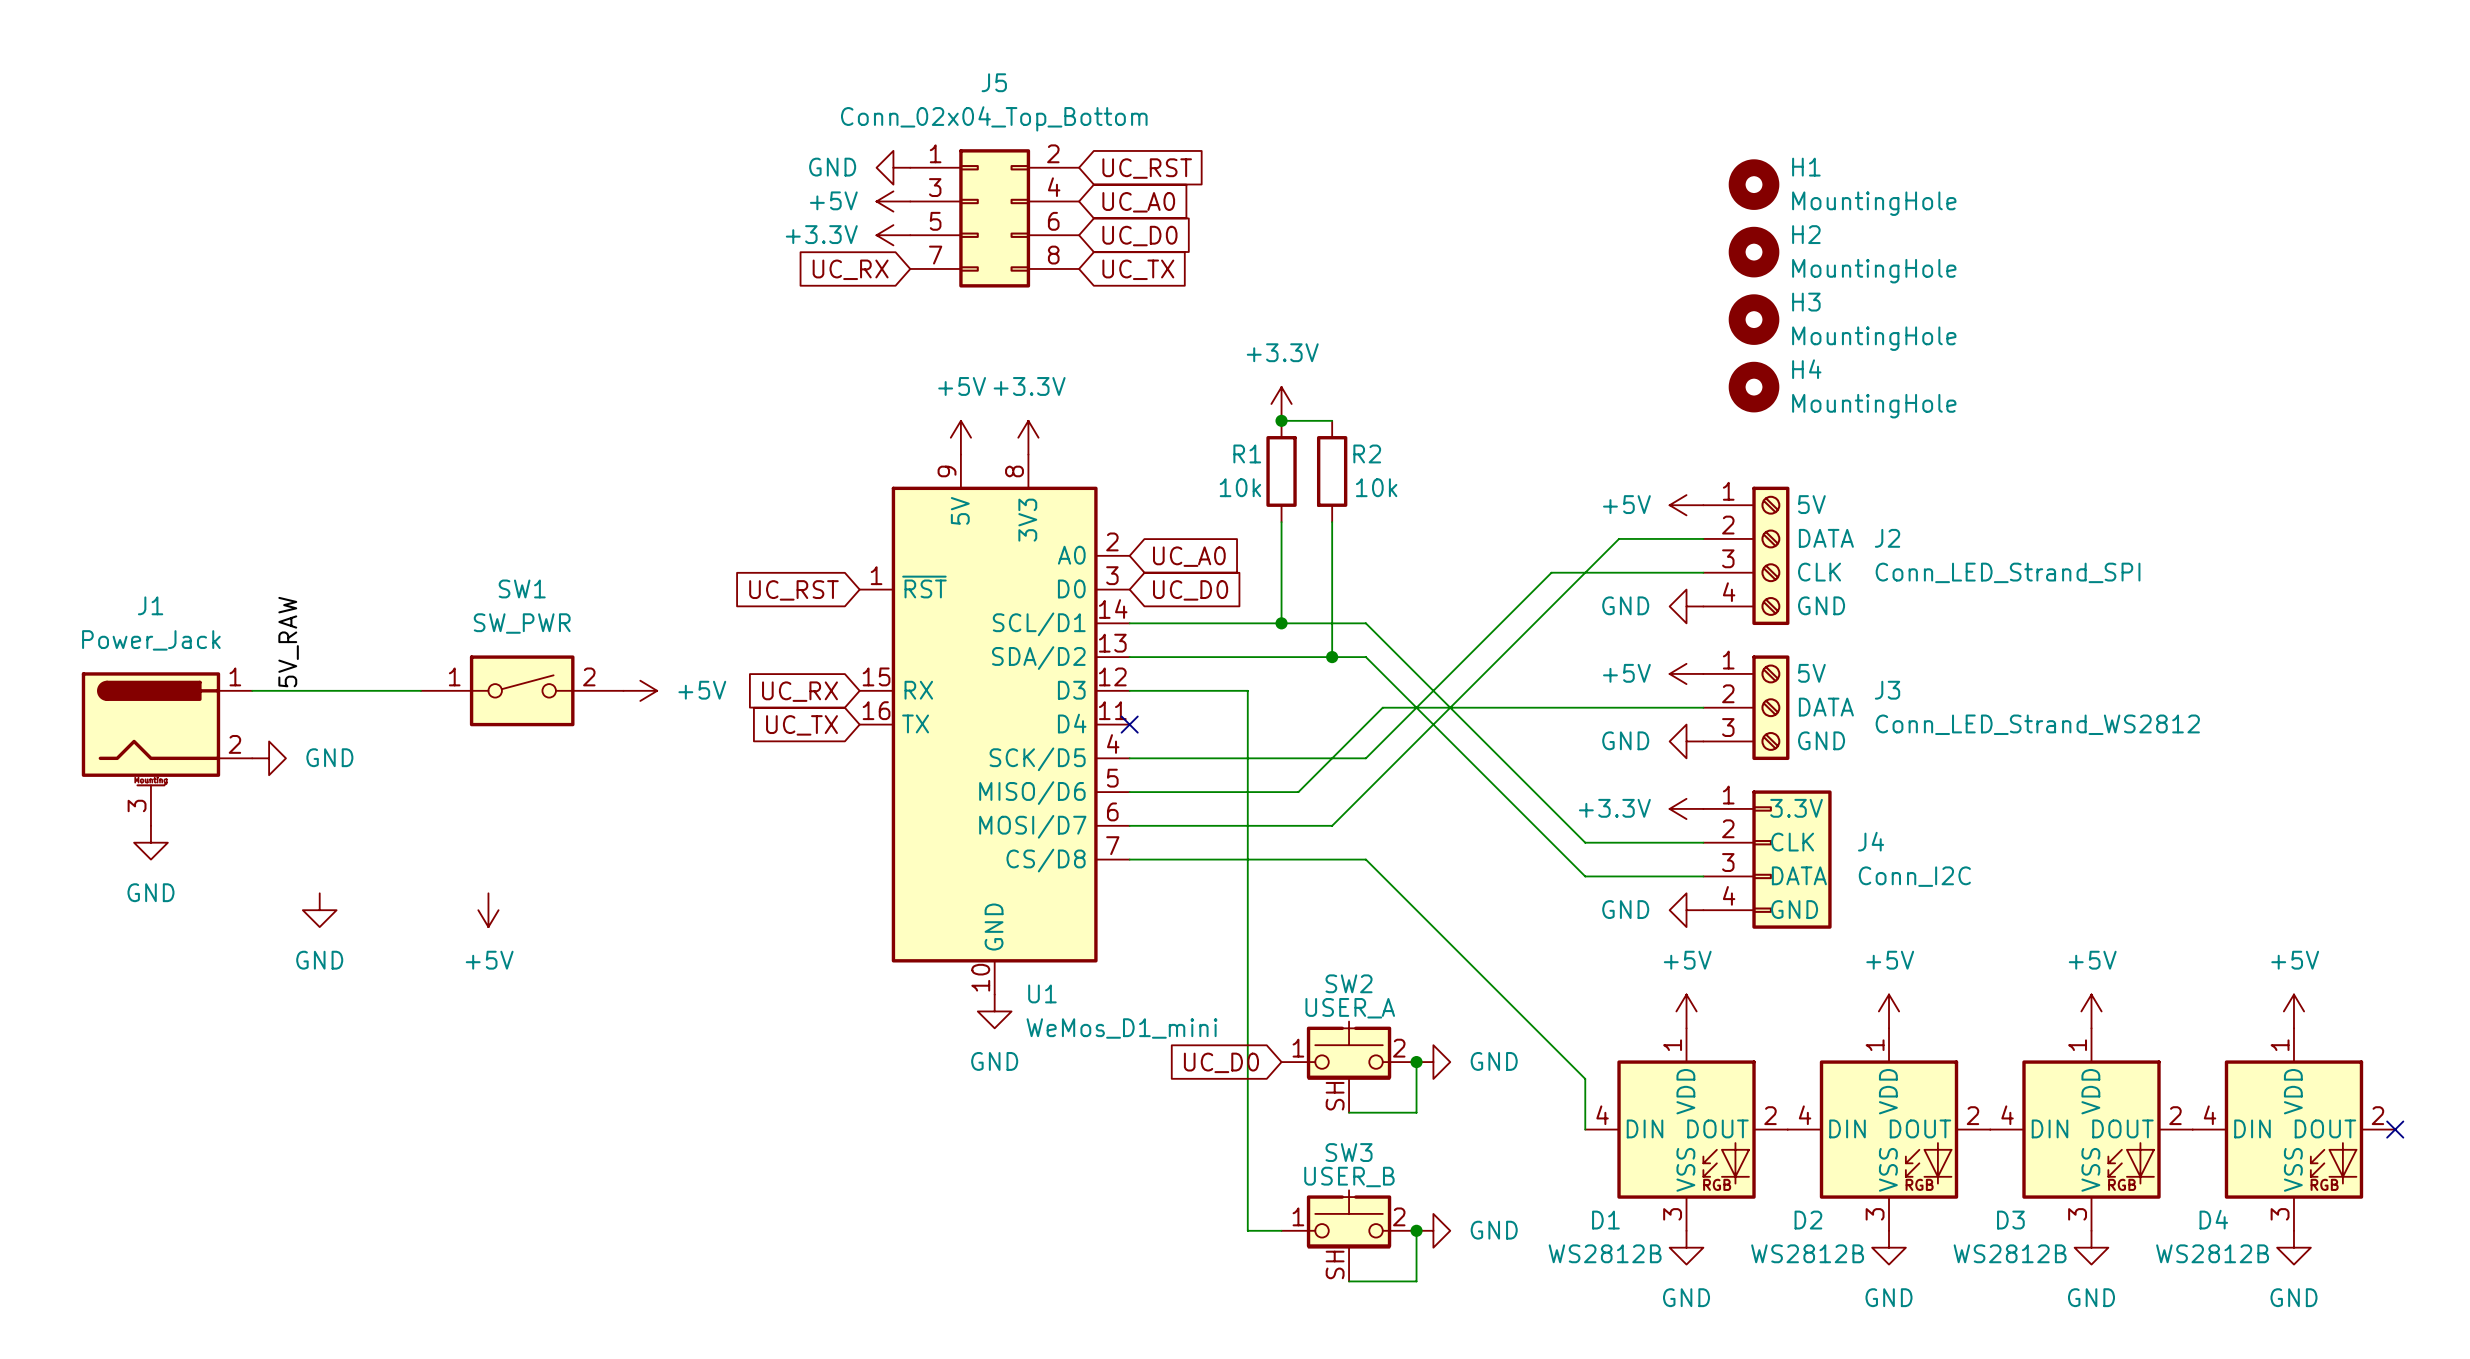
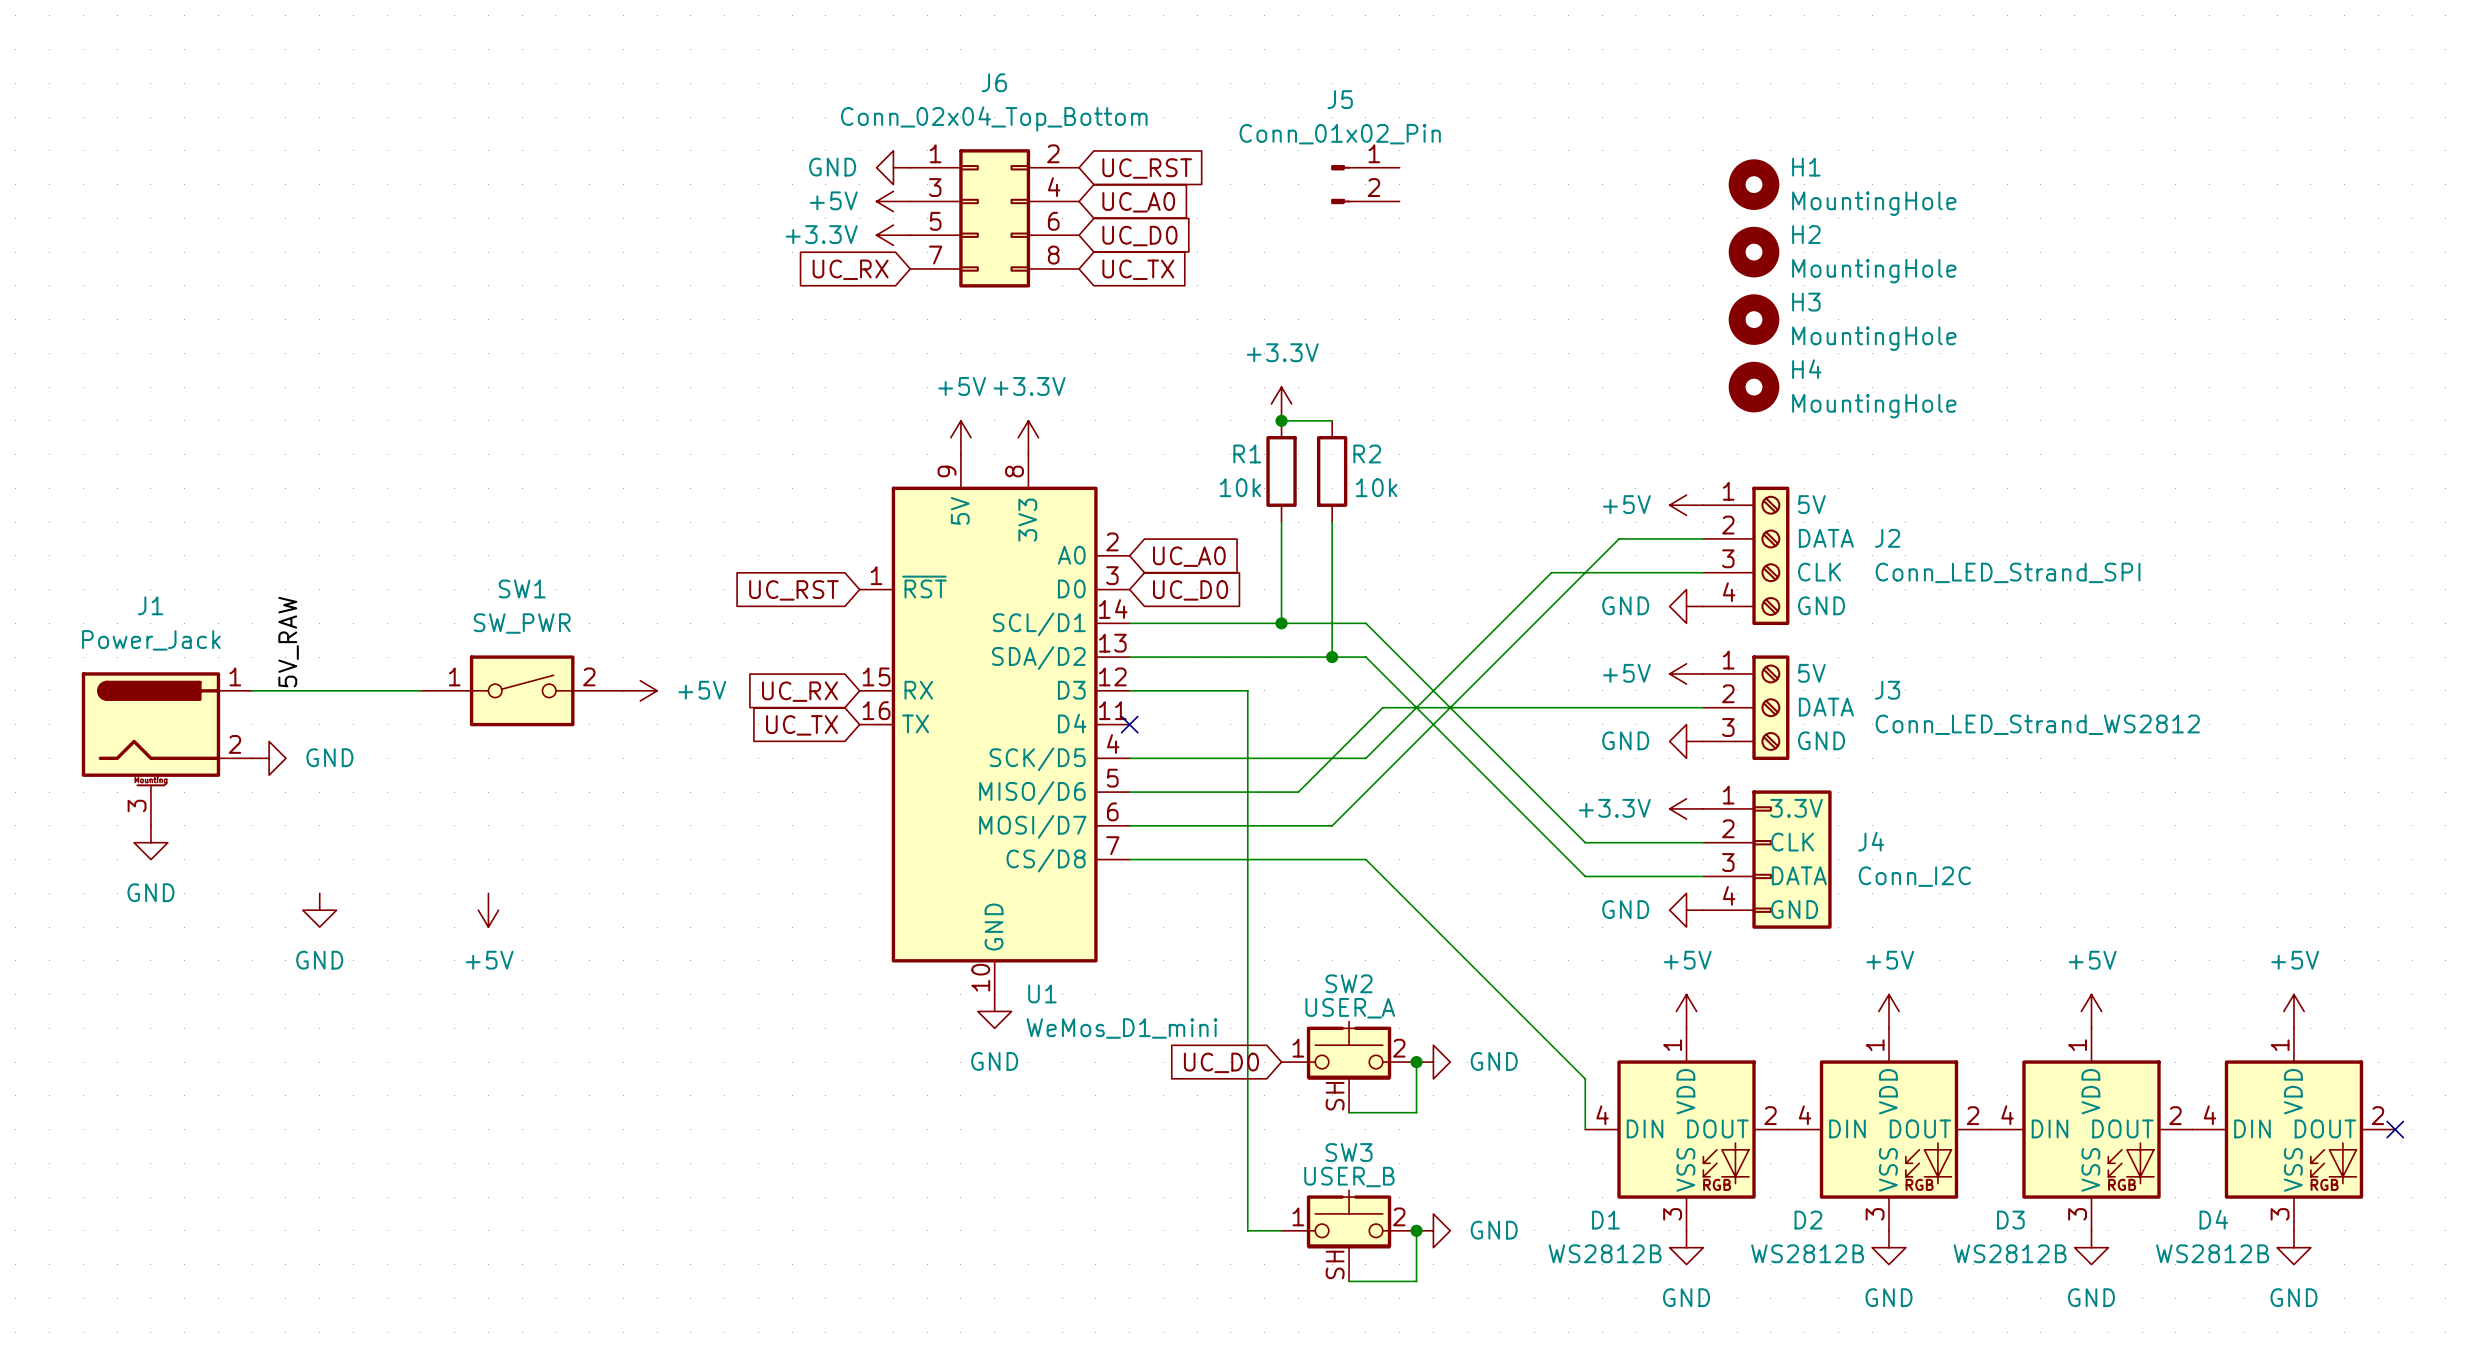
J5 name: J5 (994, 82) -> J6 (994, 82)
J5: none -> Conn_01x02_Pin (1365, 184)

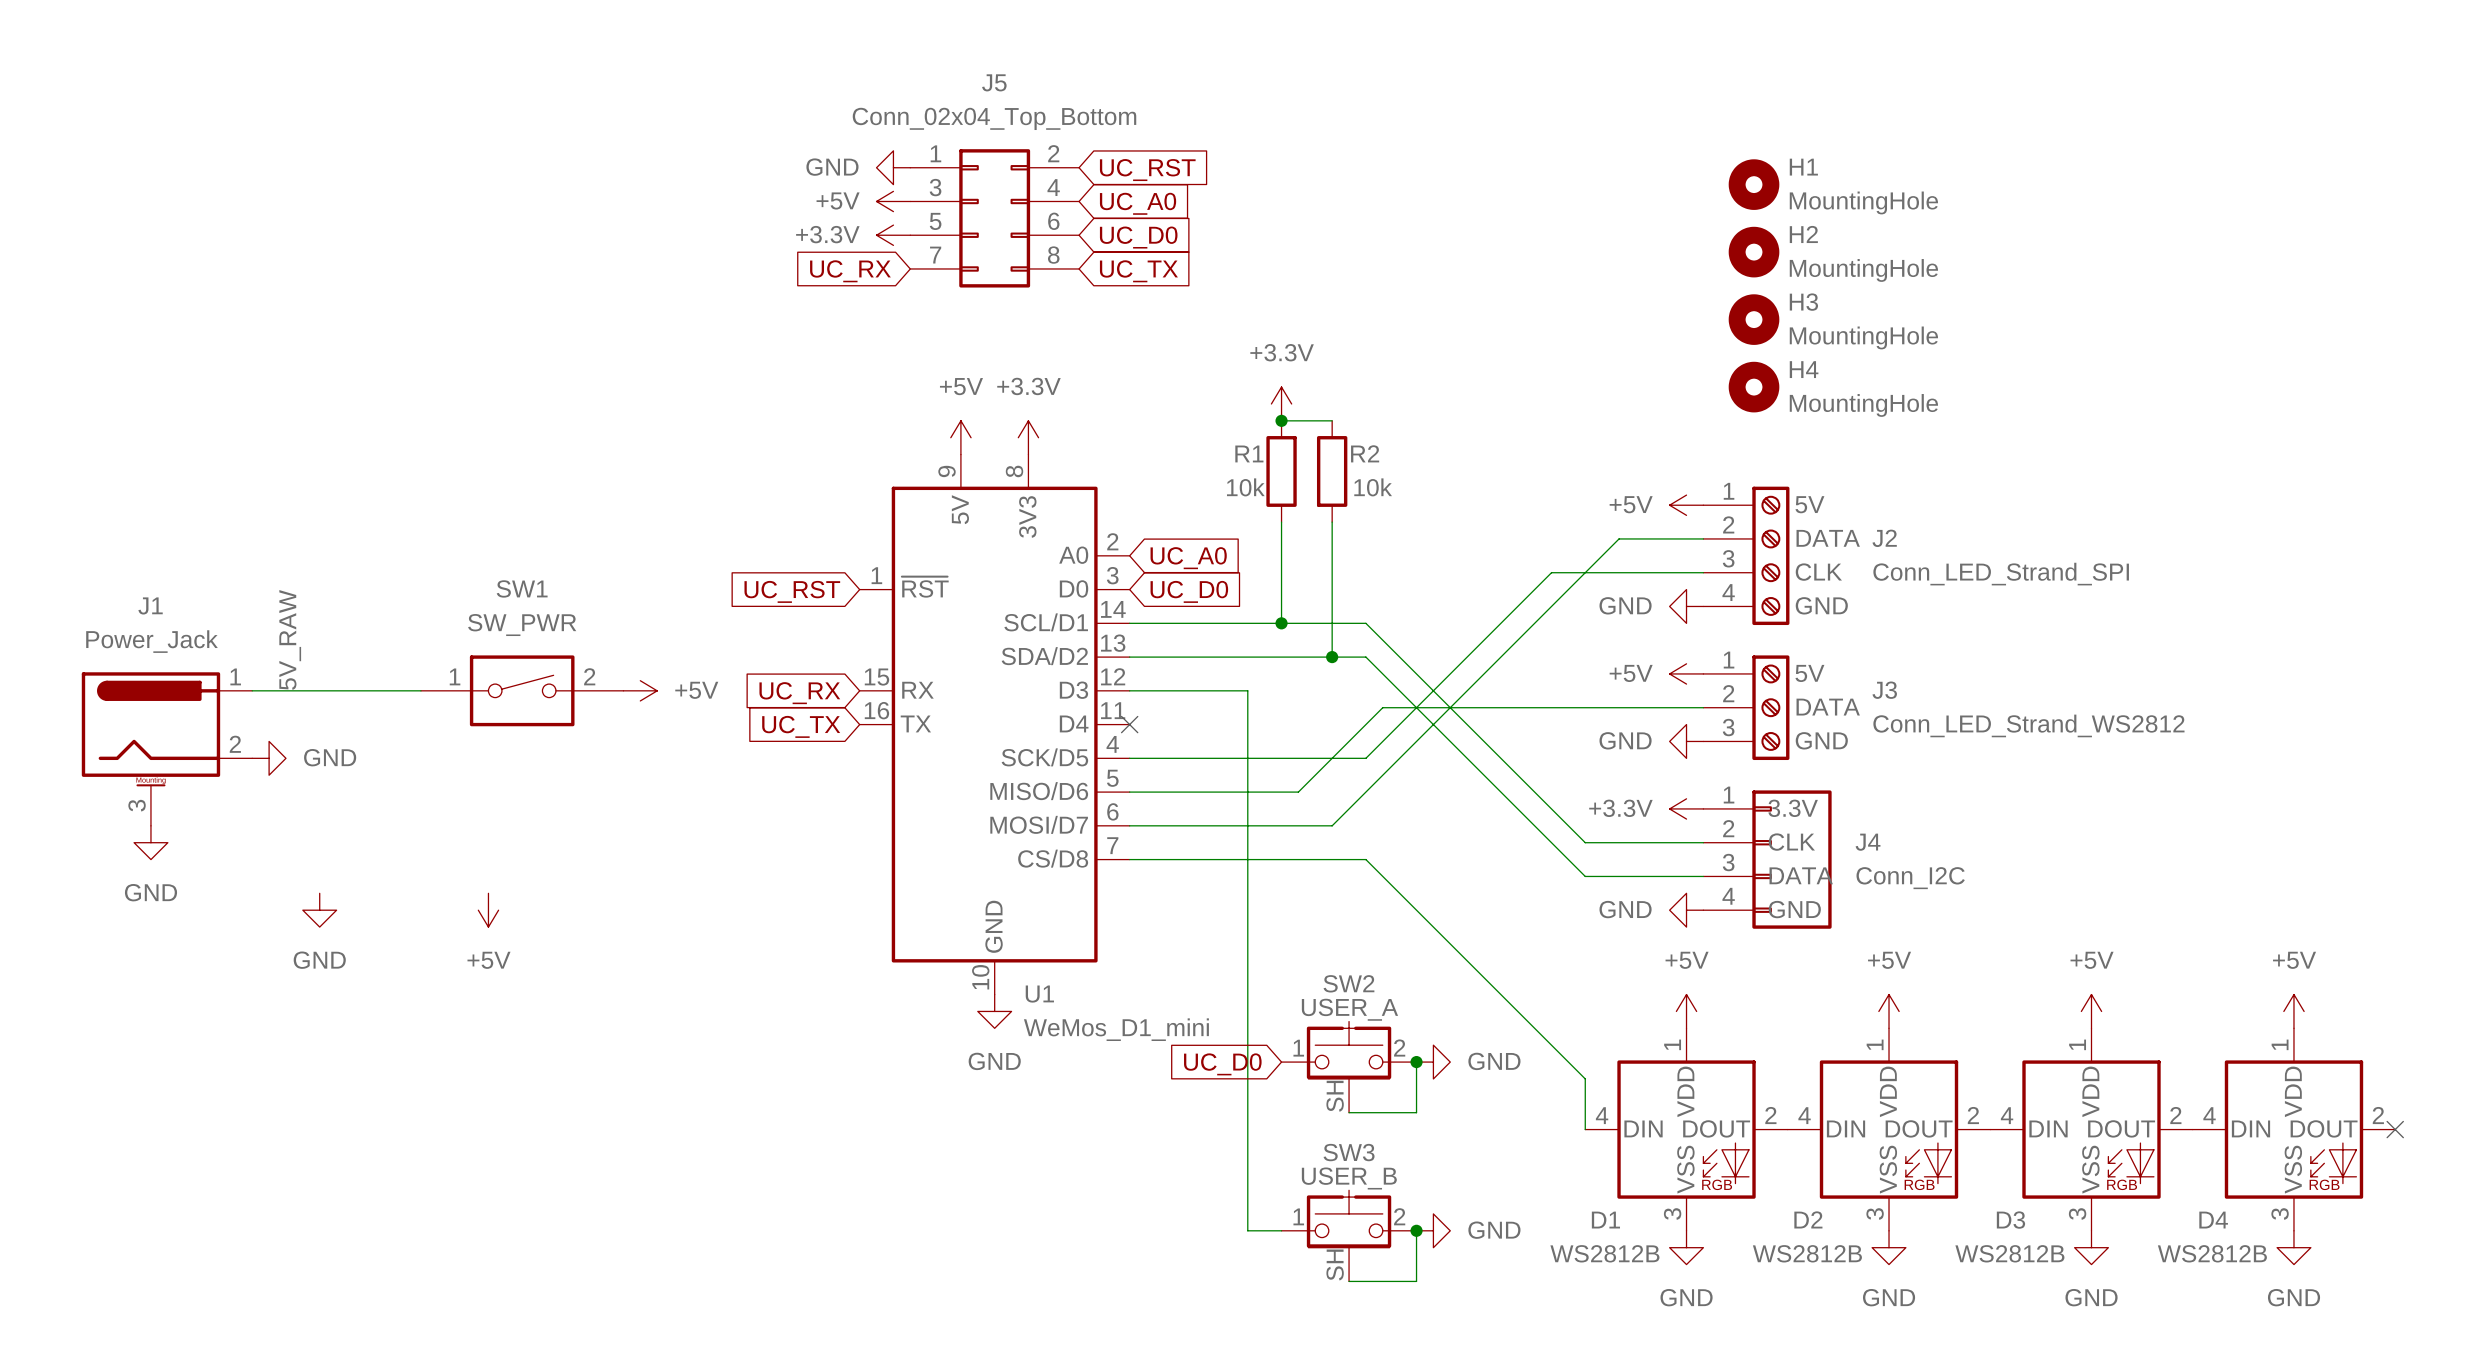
J6 name: J6 (994, 82) -> J5 (994, 82)
J5: Conn_01x02_Pin (1365, 184) -> none

